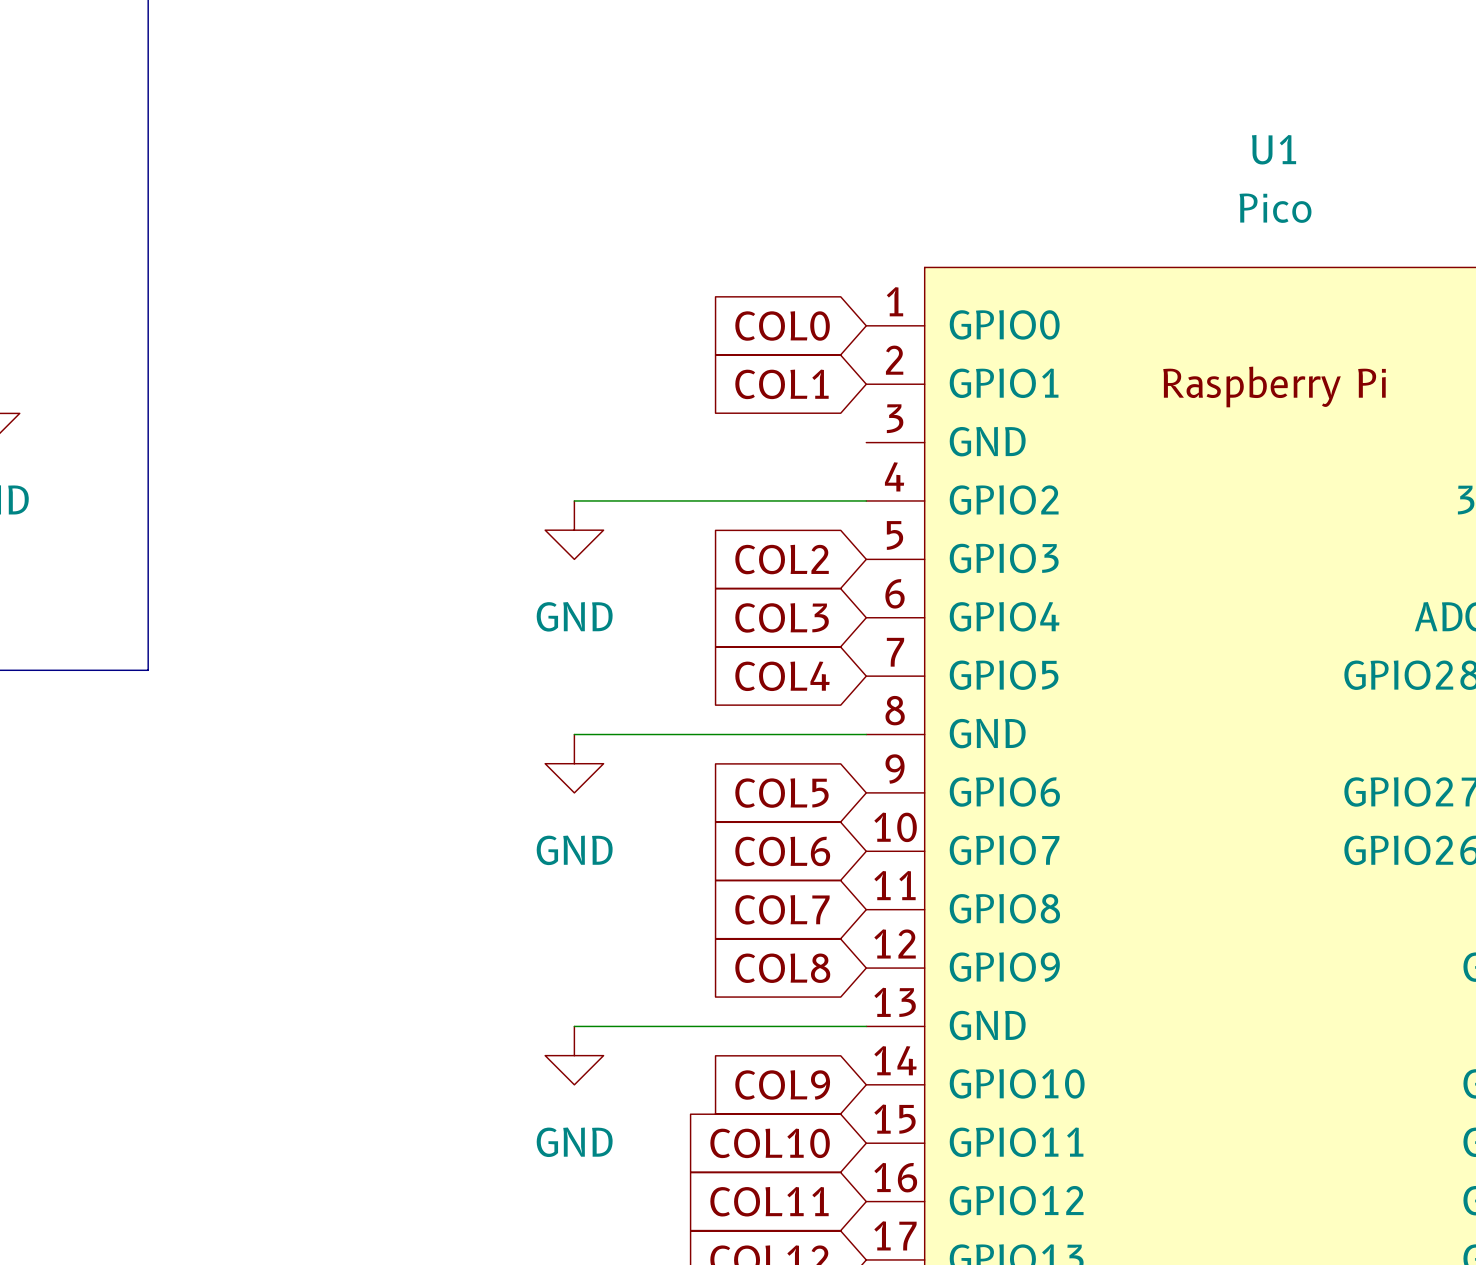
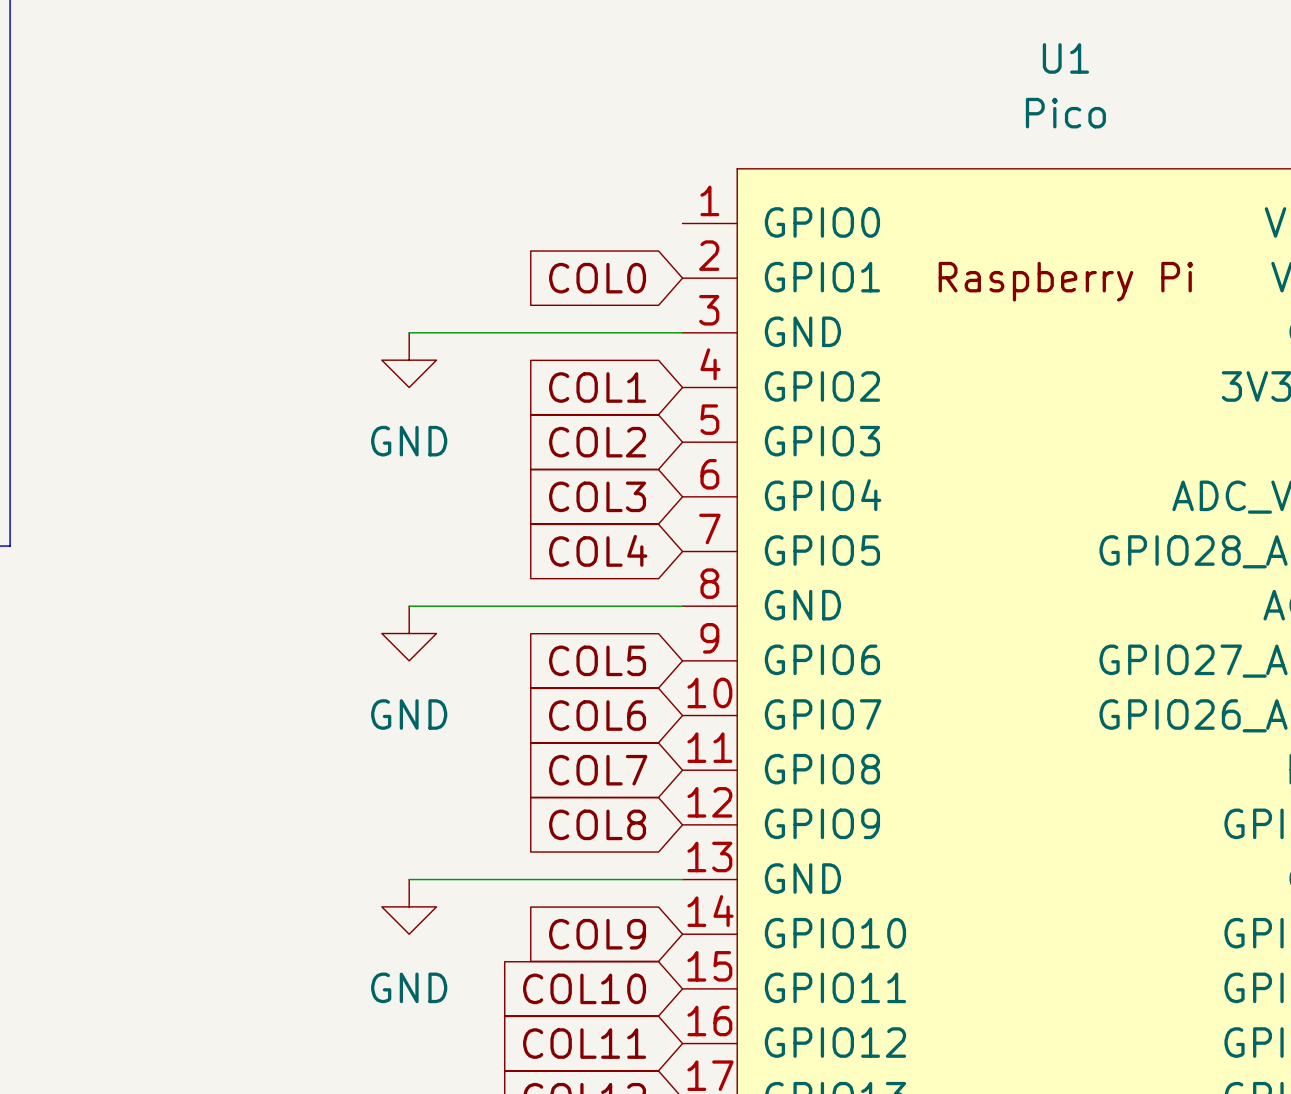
global label: COL0 (782, 325) -> none
global label: COL1 (781, 384) -> COL0 (597, 278)
wire: (574, 500) (866, 500) -> (409, 332) (682, 332)
global label: none -> COL1 (597, 387)
power symbol position: GND (574, 530) -> GND (409, 360)

